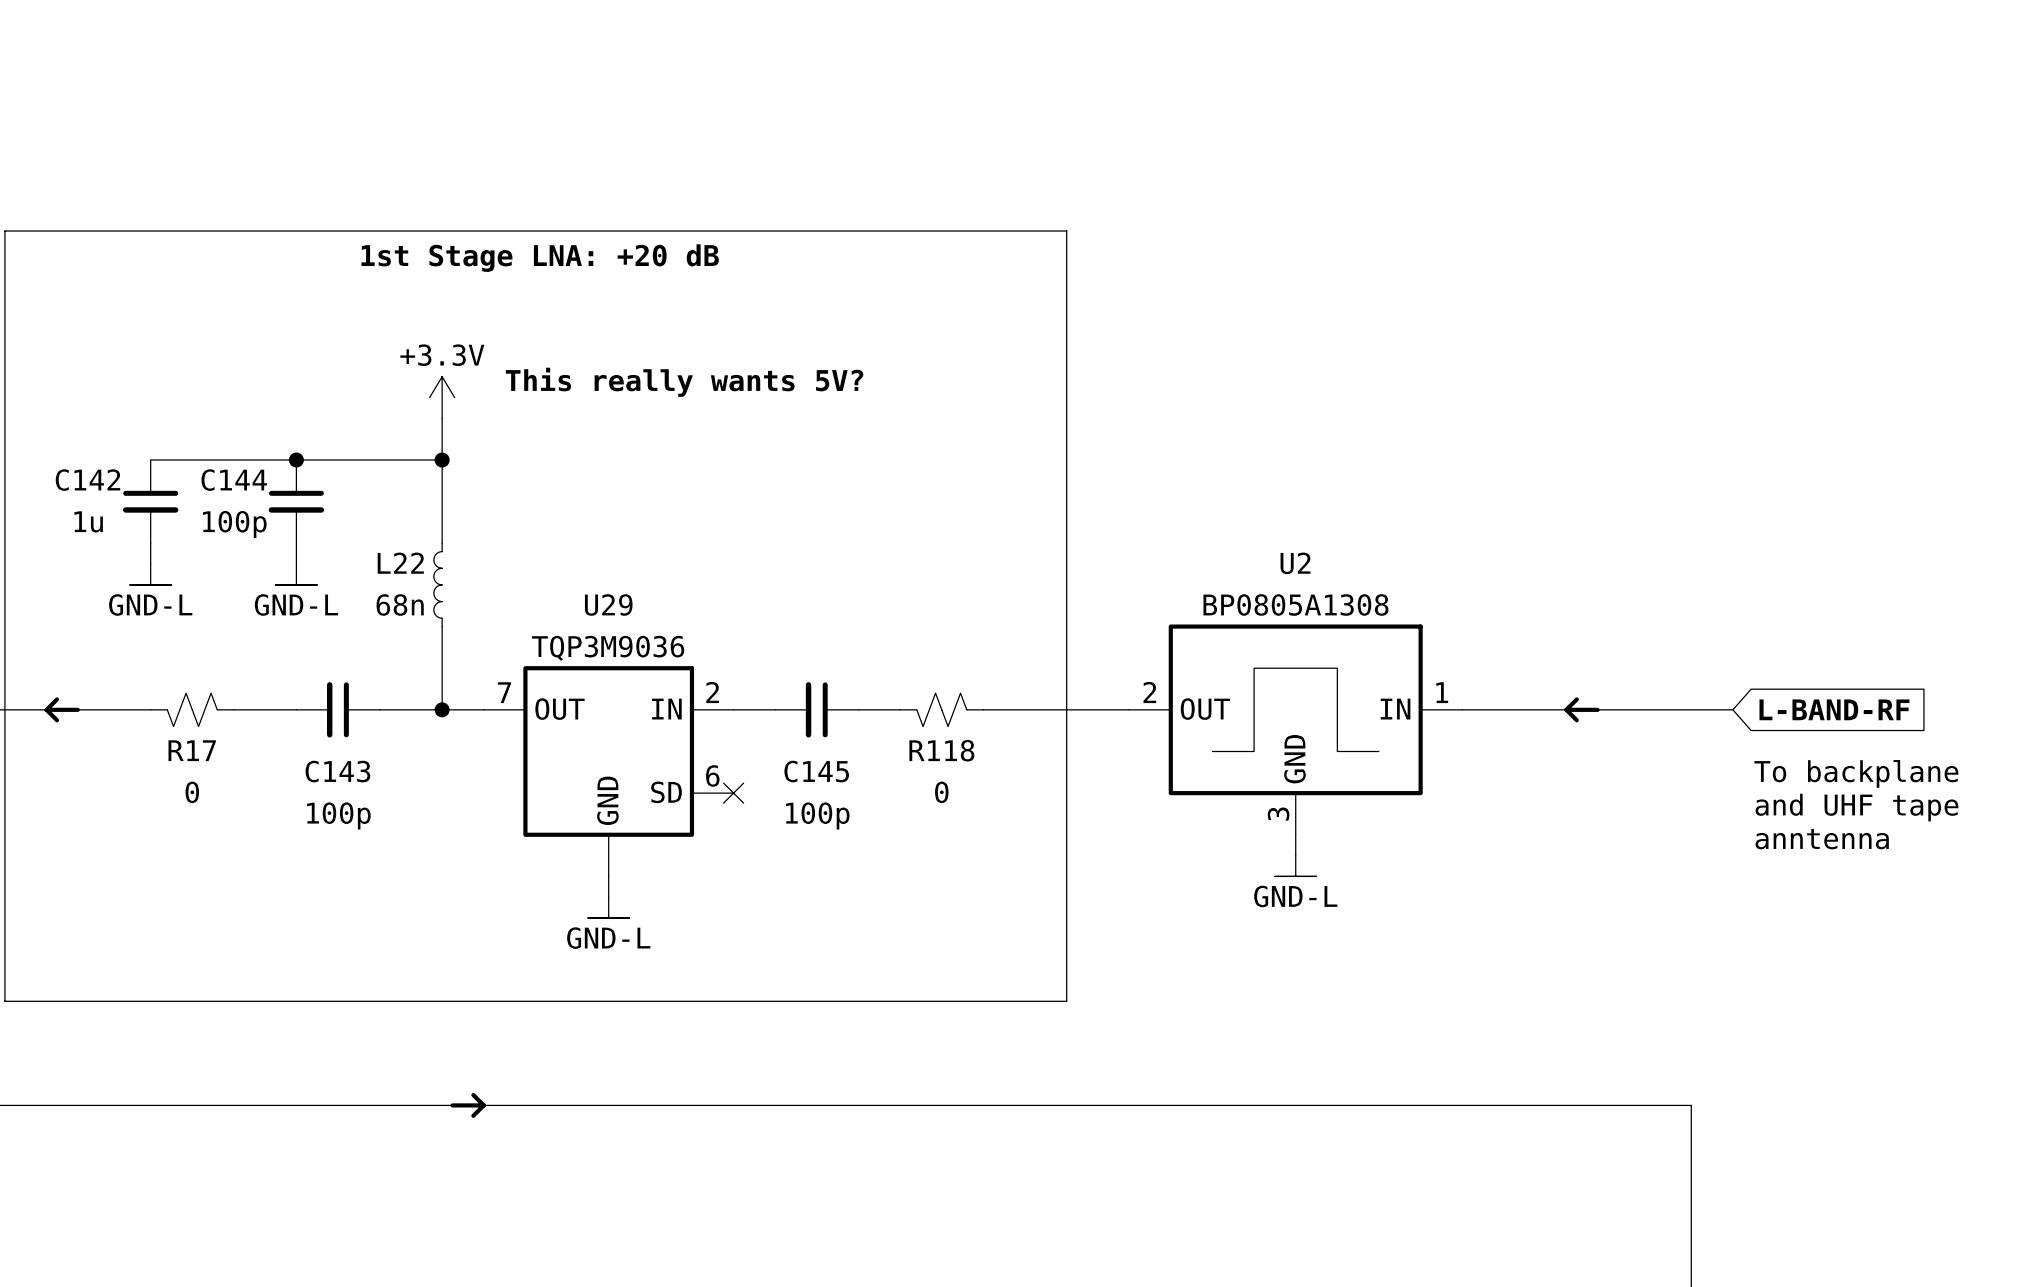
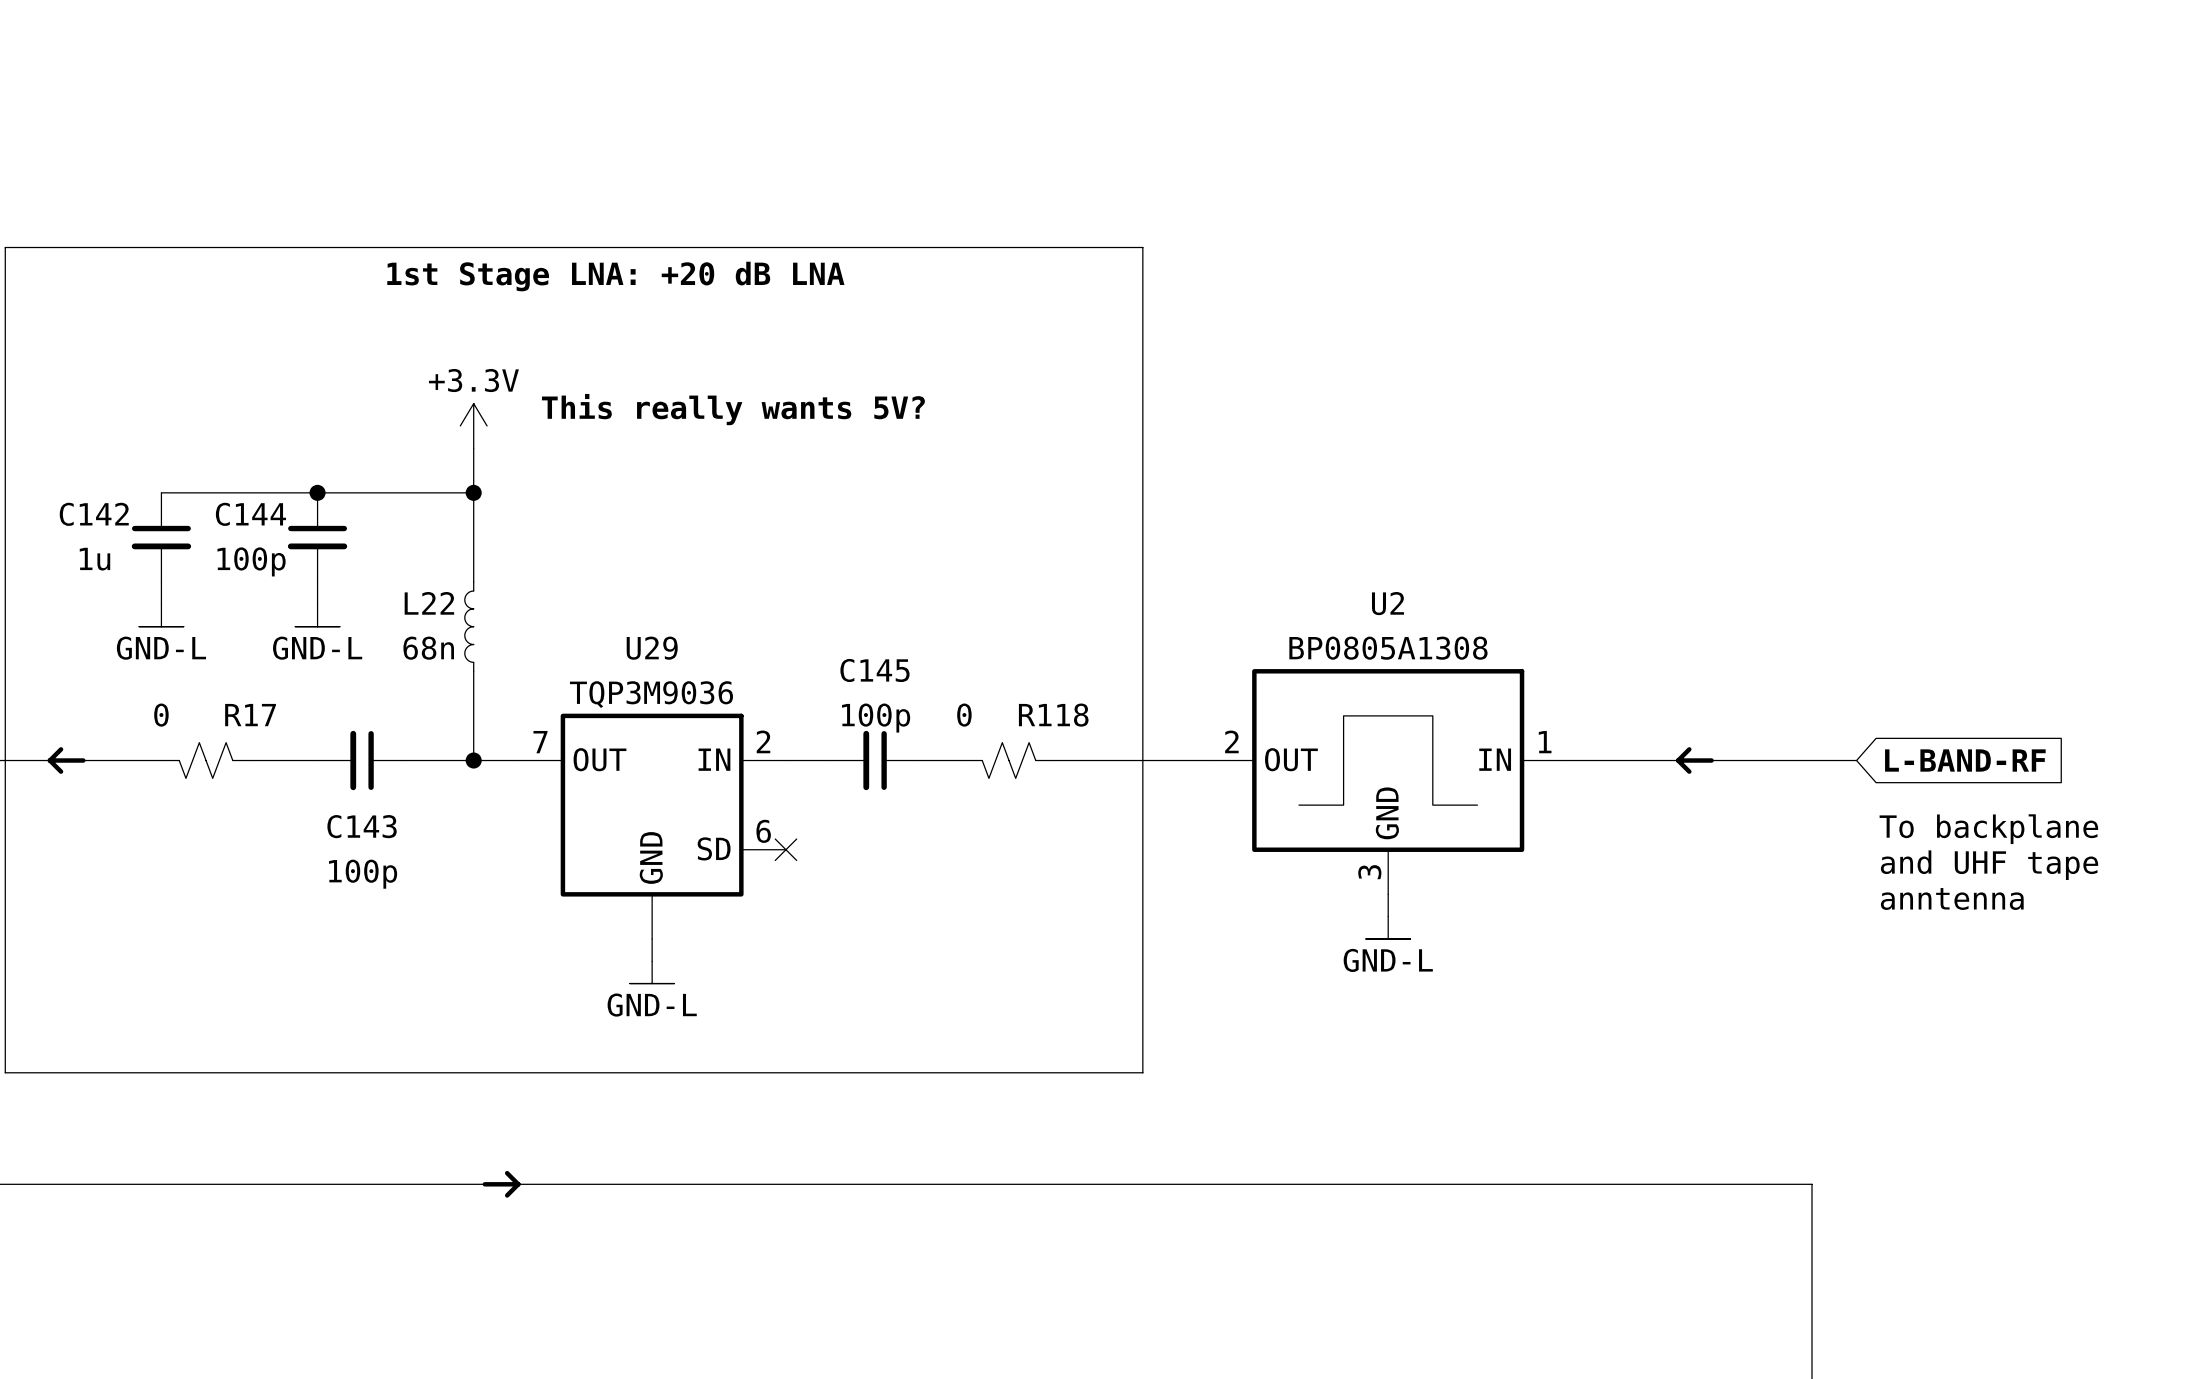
text: 1st Stage LNA: +20 dB (540, 258) -> 1st Stage LNA: +20 dB LNA (615, 276)
R17 name position: R17 (192, 750) -> R17 (250, 715)
R118 name position: R118 (941, 750) -> R118 (1053, 715)
C145 name position: C145 (816, 771) -> C145 (875, 670)
R17 value position: 0 (192, 792) -> 0 (161, 715)
R118 value position: 0 (941, 792) -> 0 (964, 715)
C145 value position: 100p (817, 815) -> 100p (876, 718)

